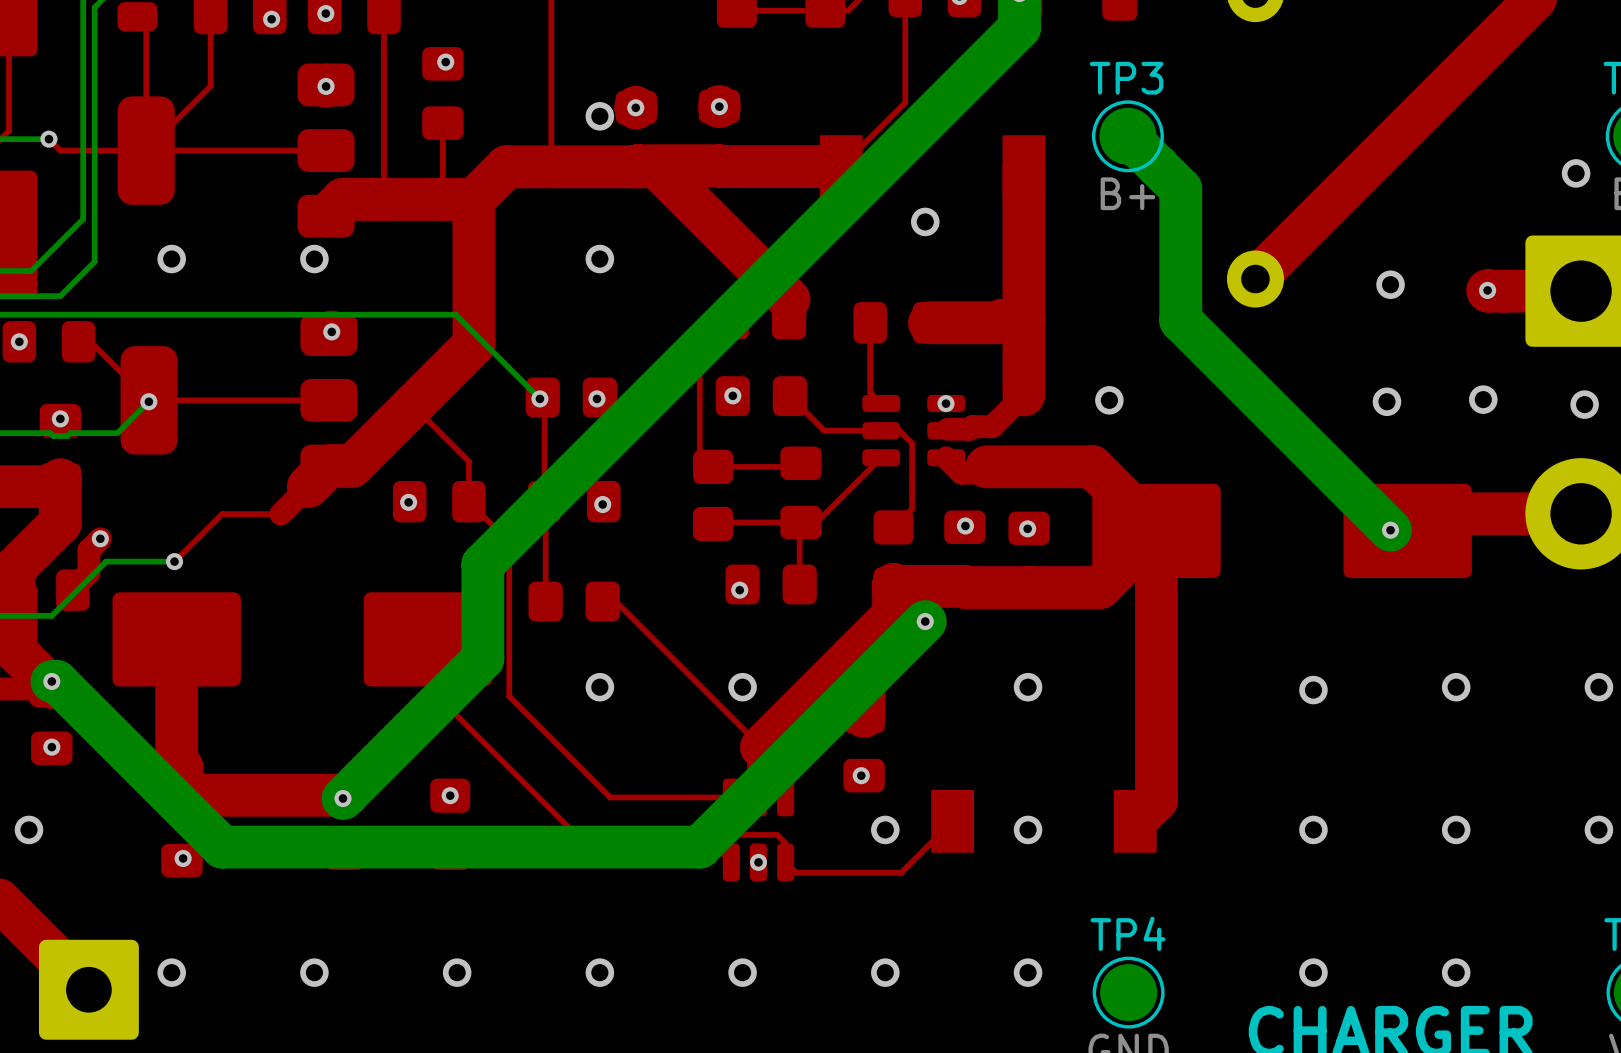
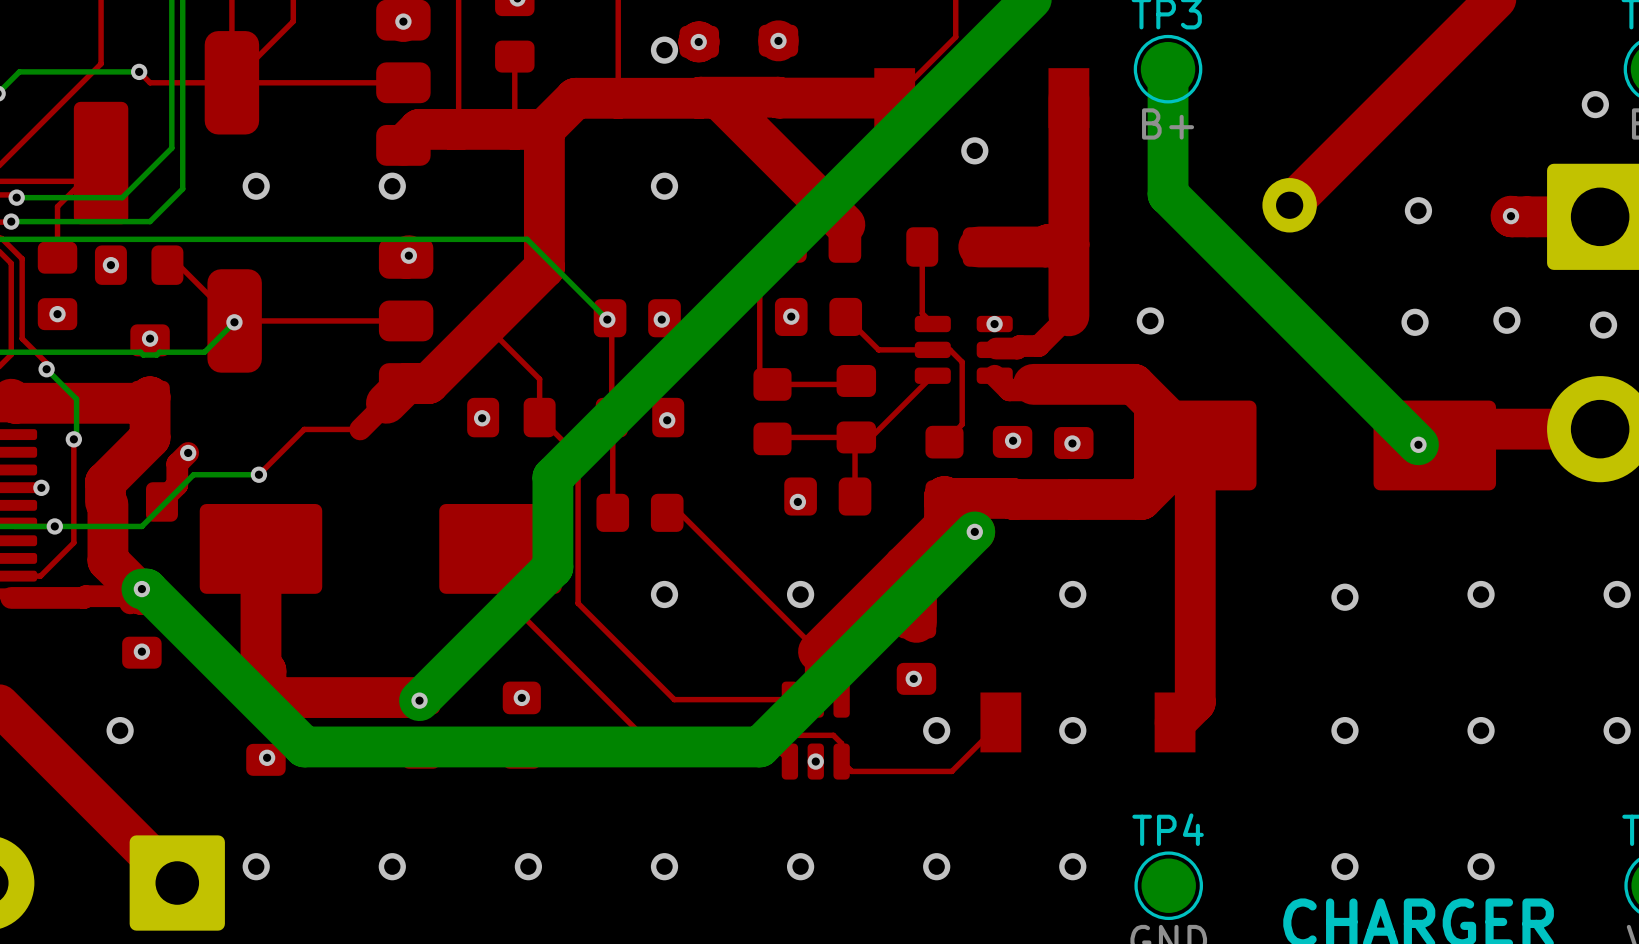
bottom track: (1127, 136) (1180, 189) (1180, 320) -> (1168, 69) (1168, 194) (1218, 244)

